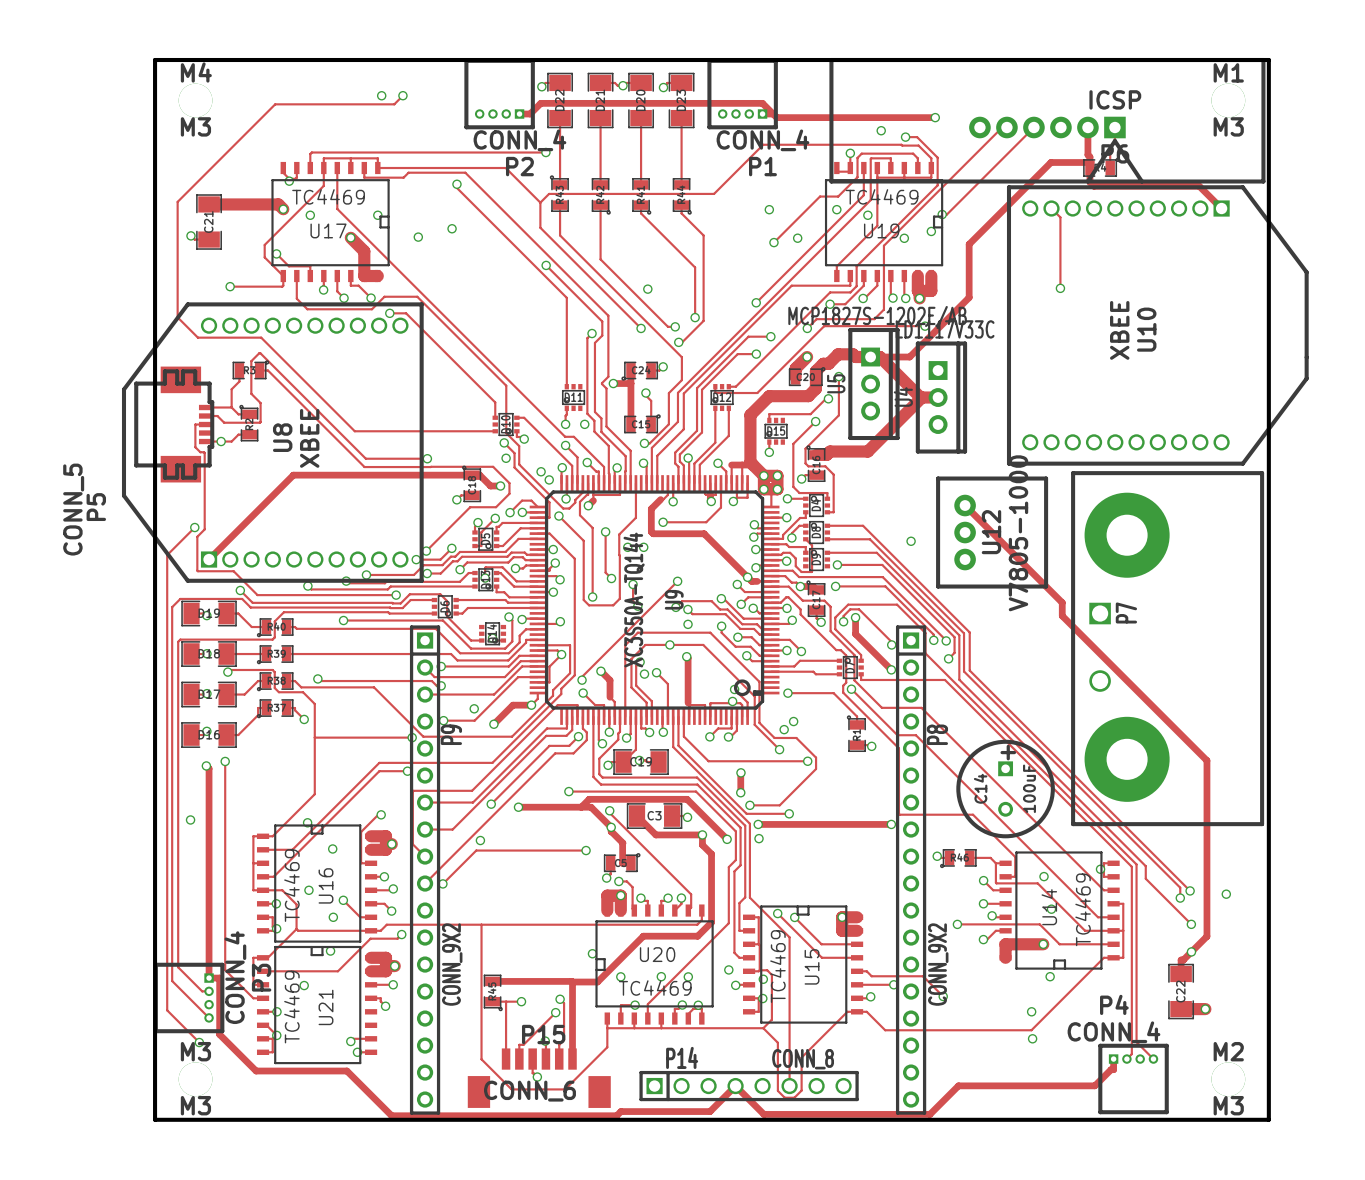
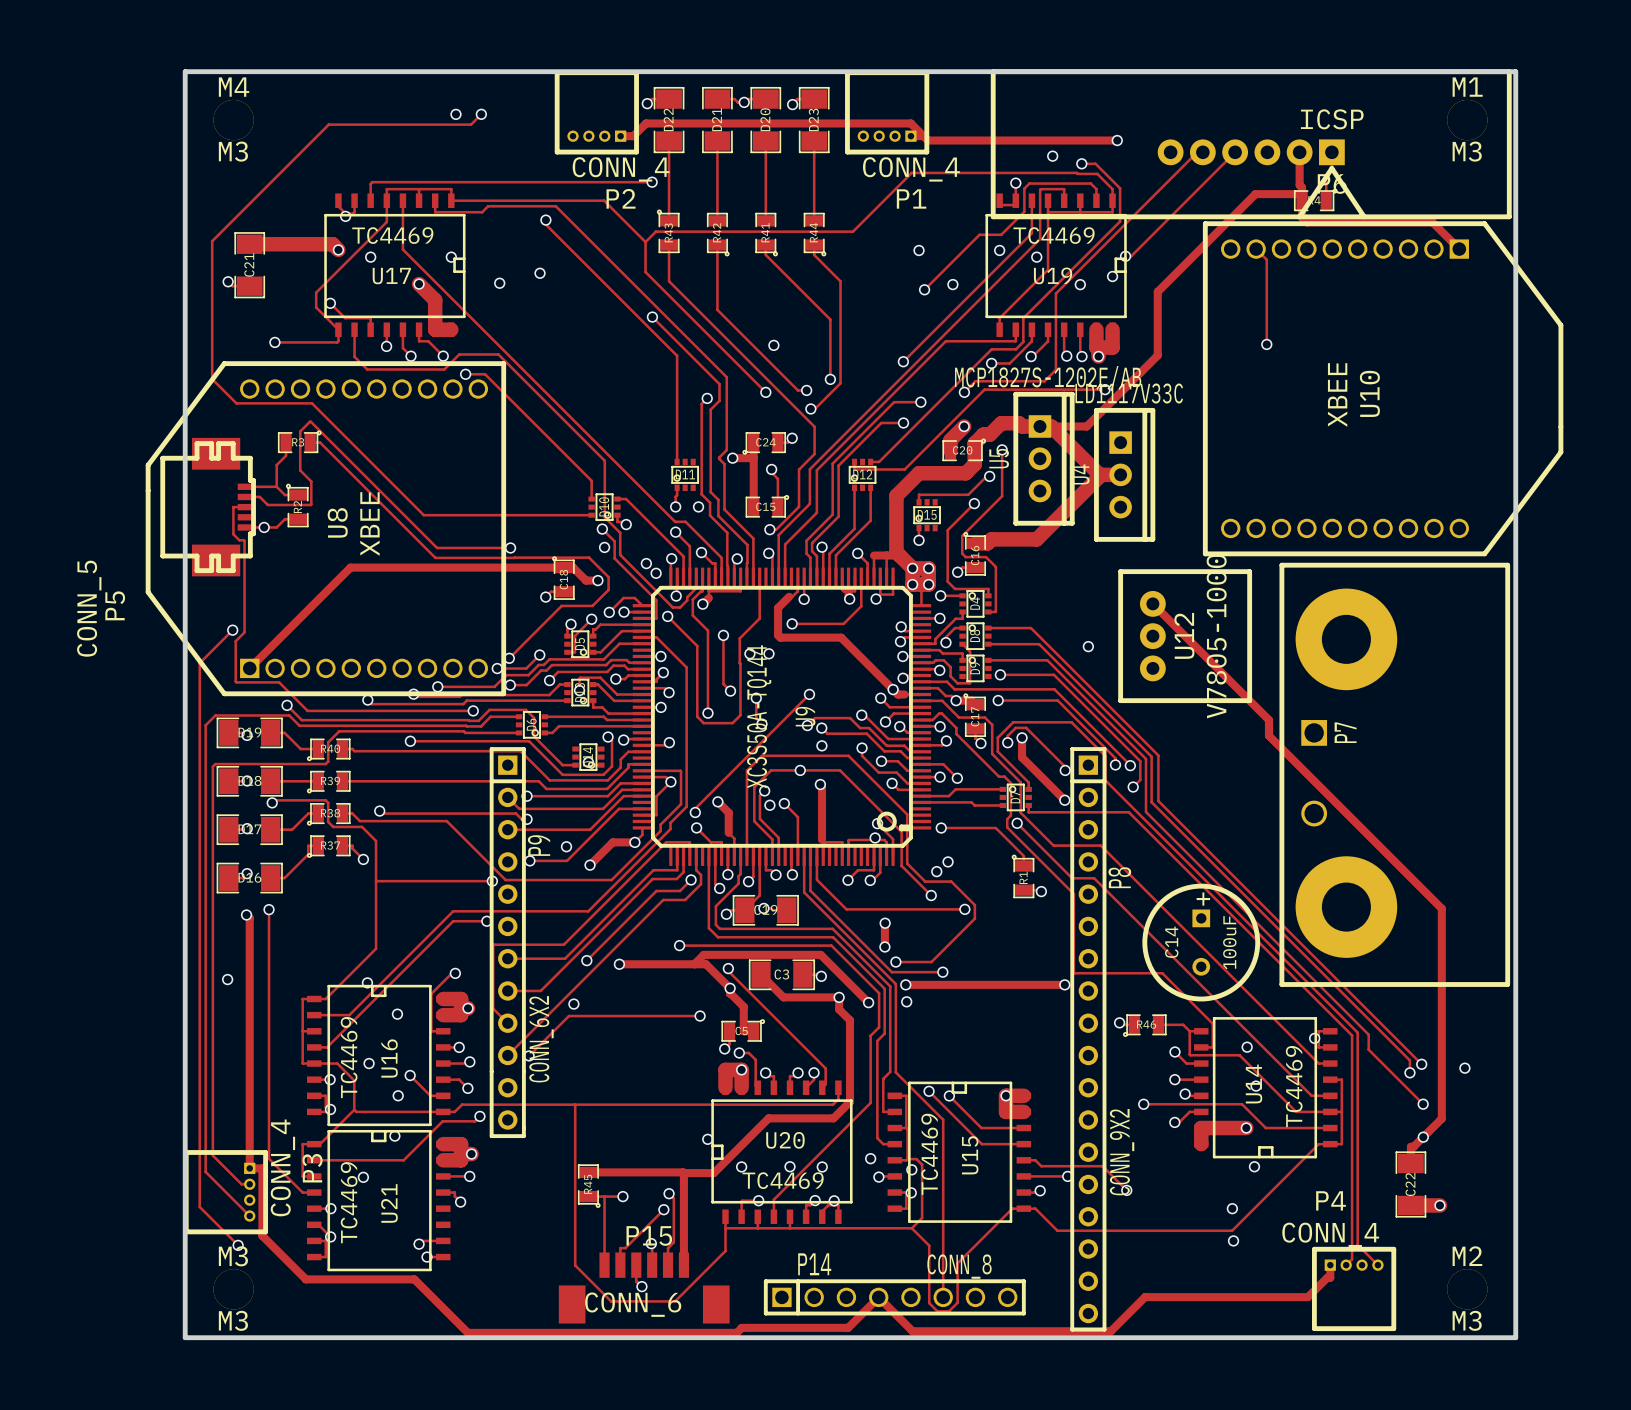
P9 footprint: [409, 625, 441, 1115] -> [489, 747, 526, 1139]
P9 name position: P9 (451, 734) -> P9 (539, 845)
P9 value: CONN_9X2 (452, 964) -> CONN_6X2 (541, 1039)

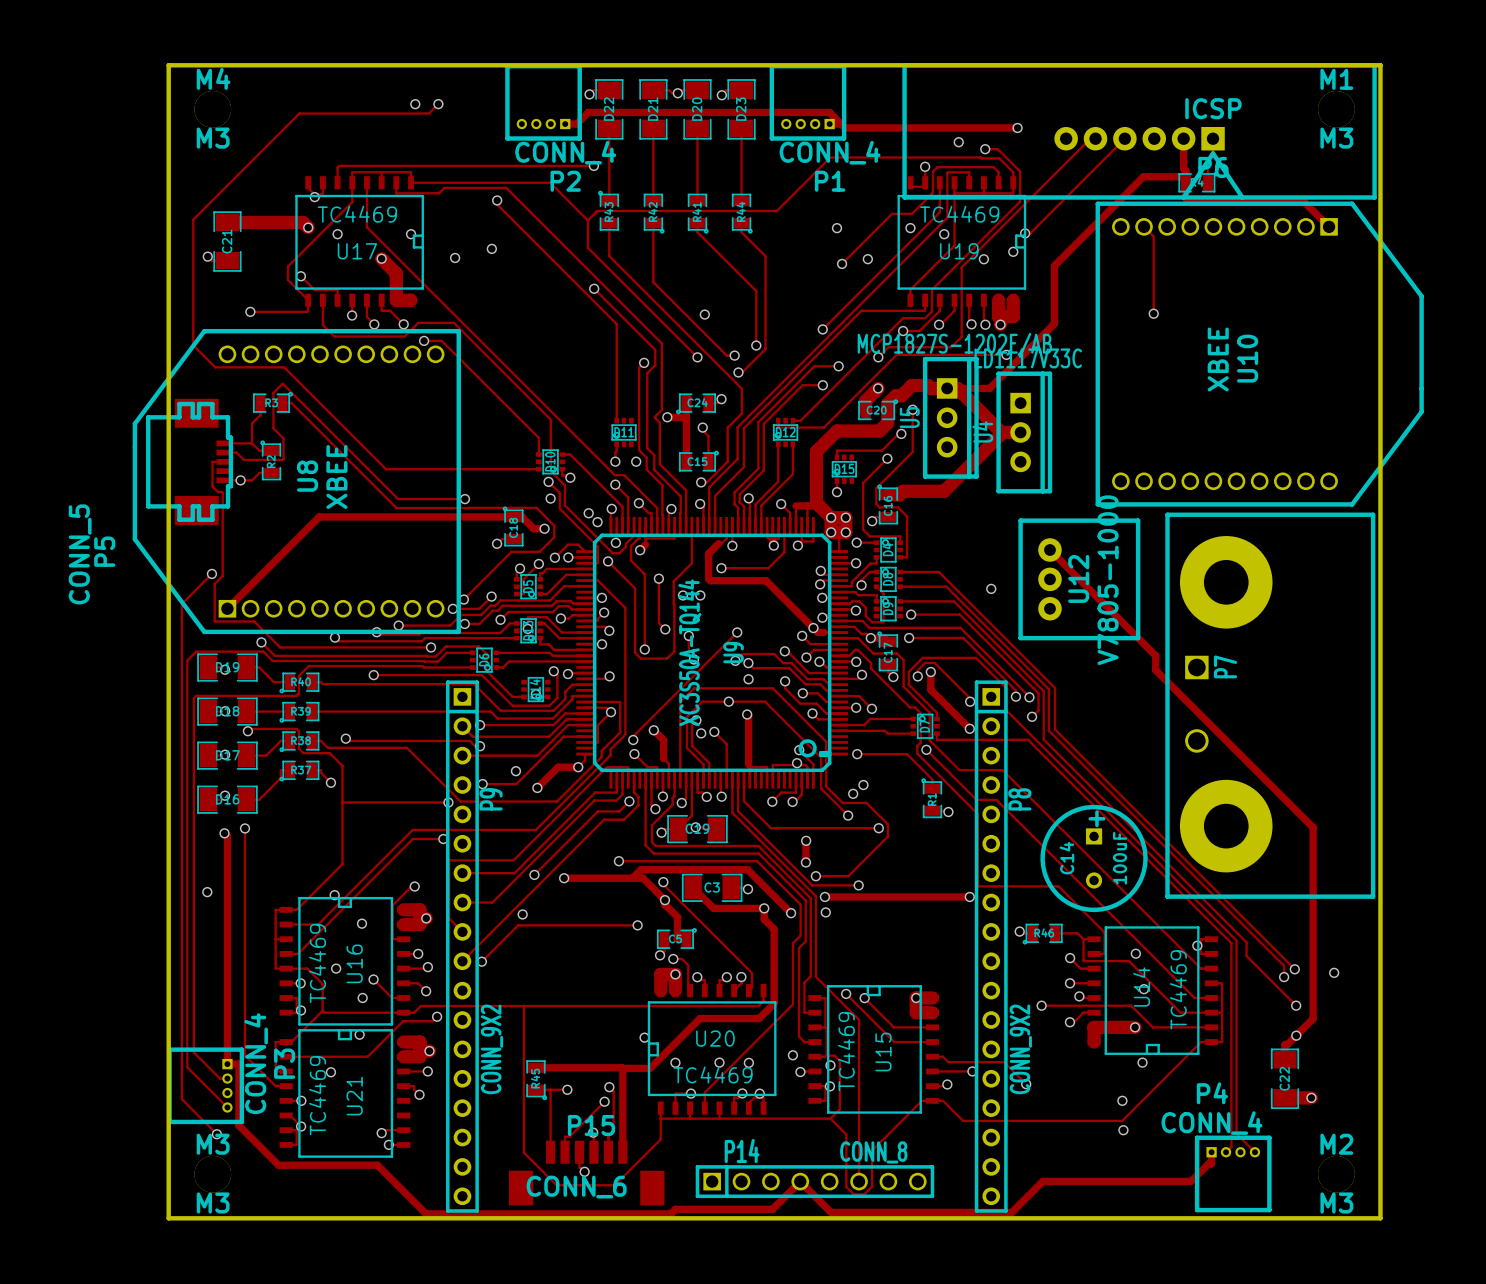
P9 footprint: [489, 747, 526, 1139] -> [446, 680, 479, 1213]
P9 name position: P9 (539, 845) -> P9 (491, 799)
P9 value: CONN_6X2 (541, 1039) -> CONN_9X2 (492, 1049)

